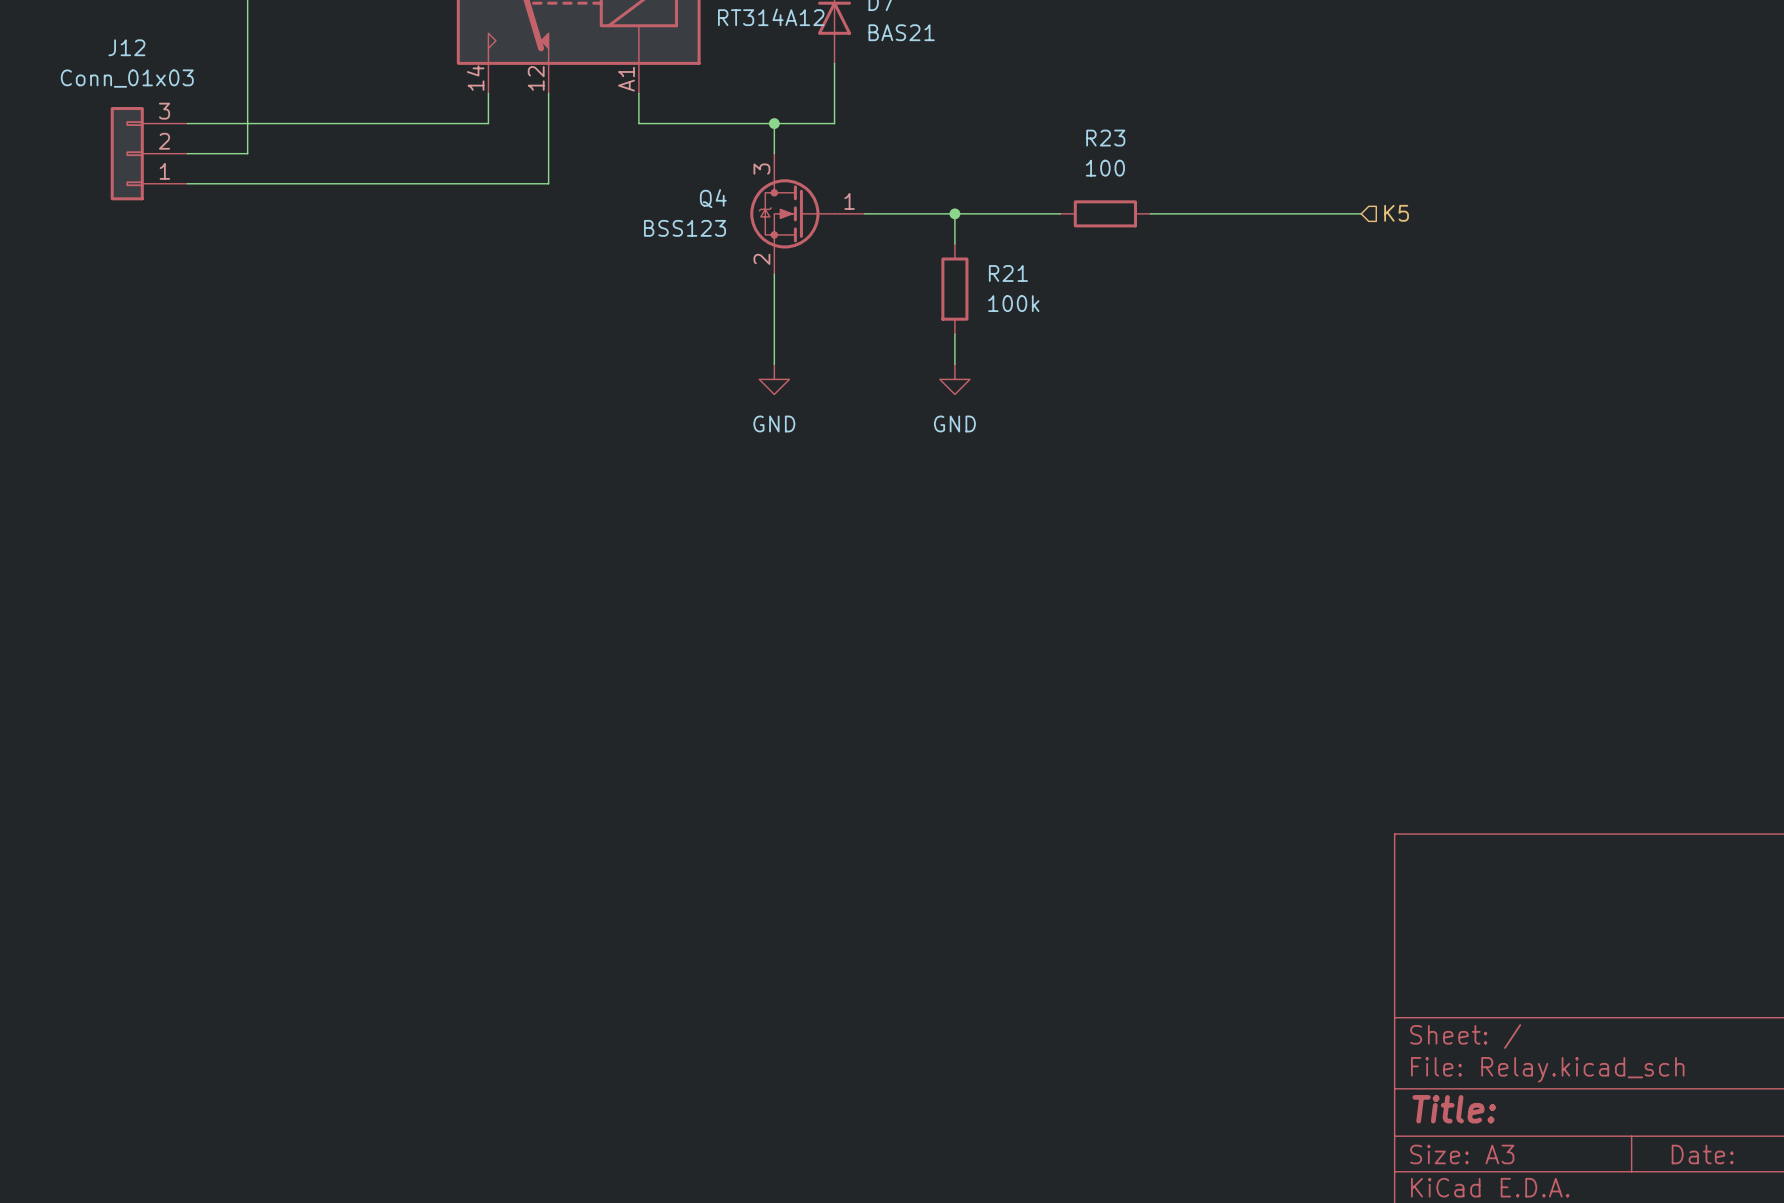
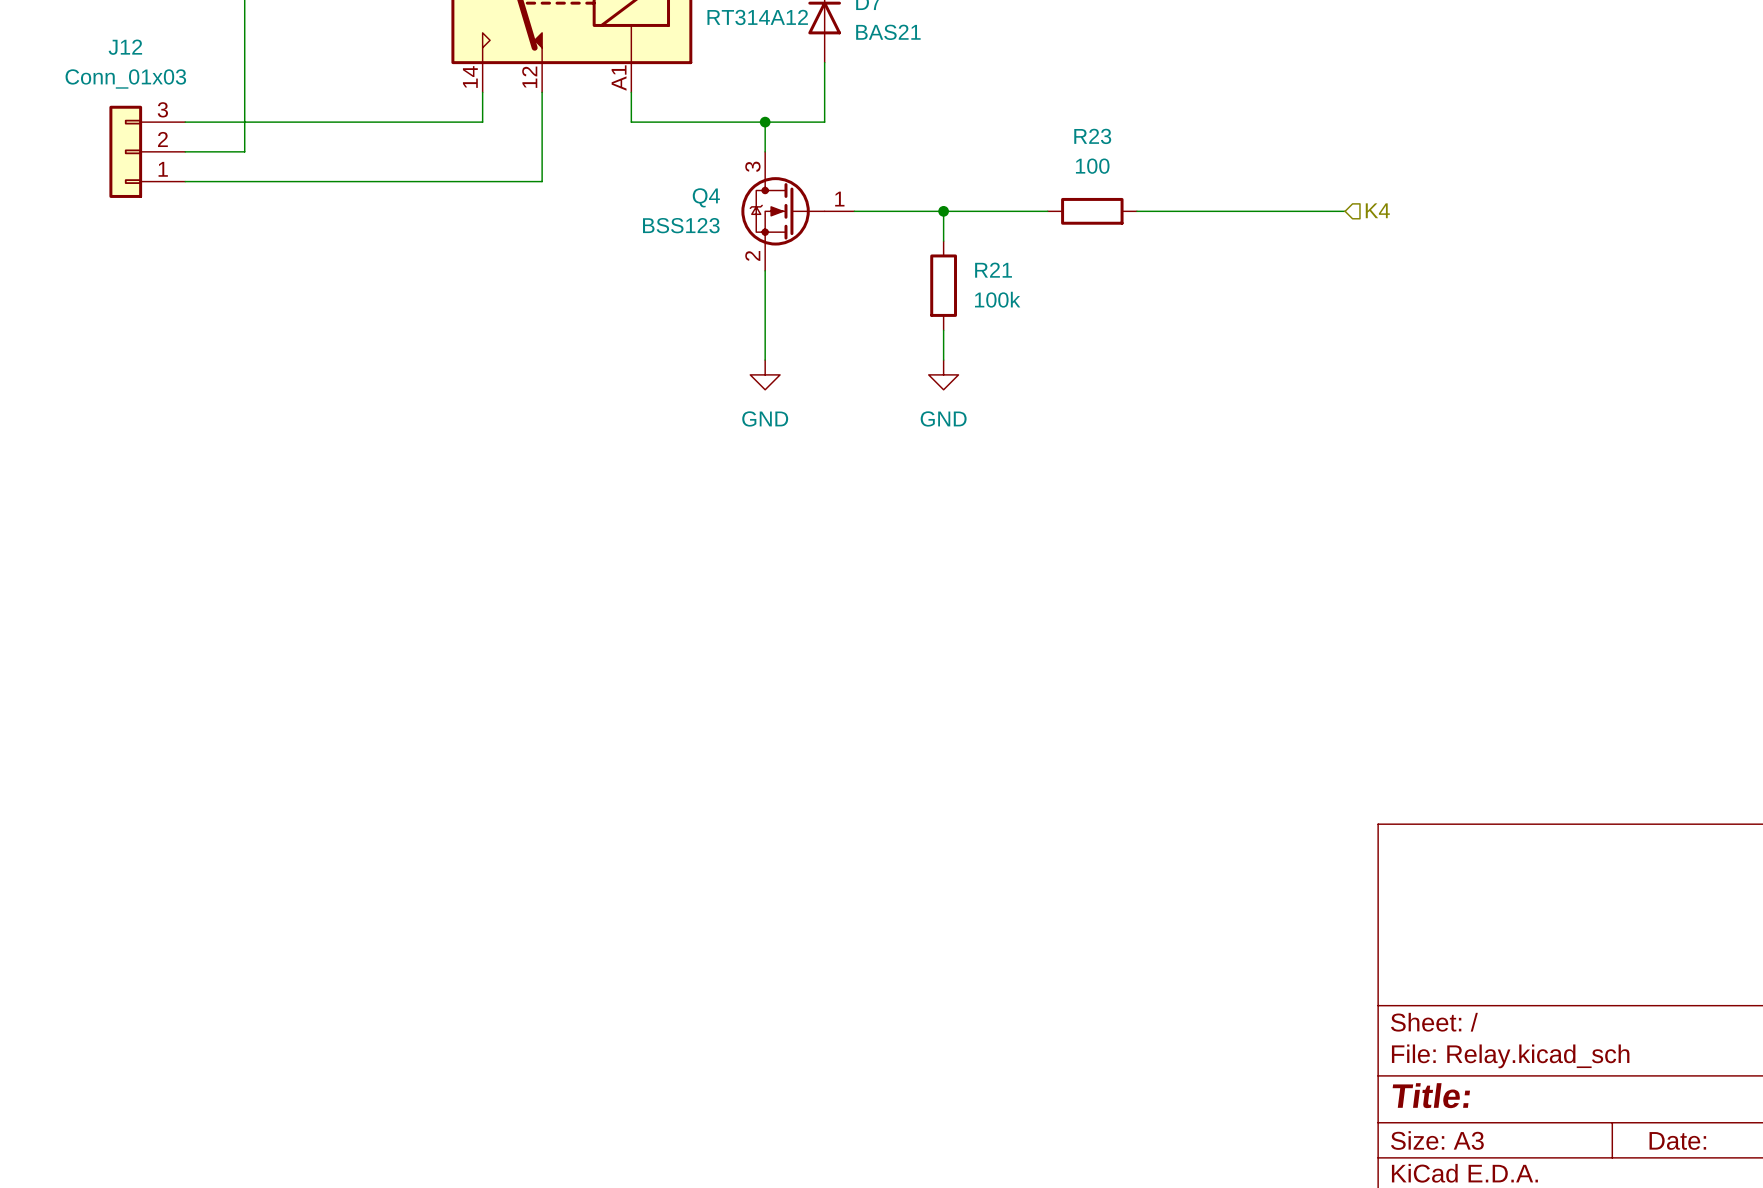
hierarchical label: K5 (1396, 213) -> K4 (1377, 210)

